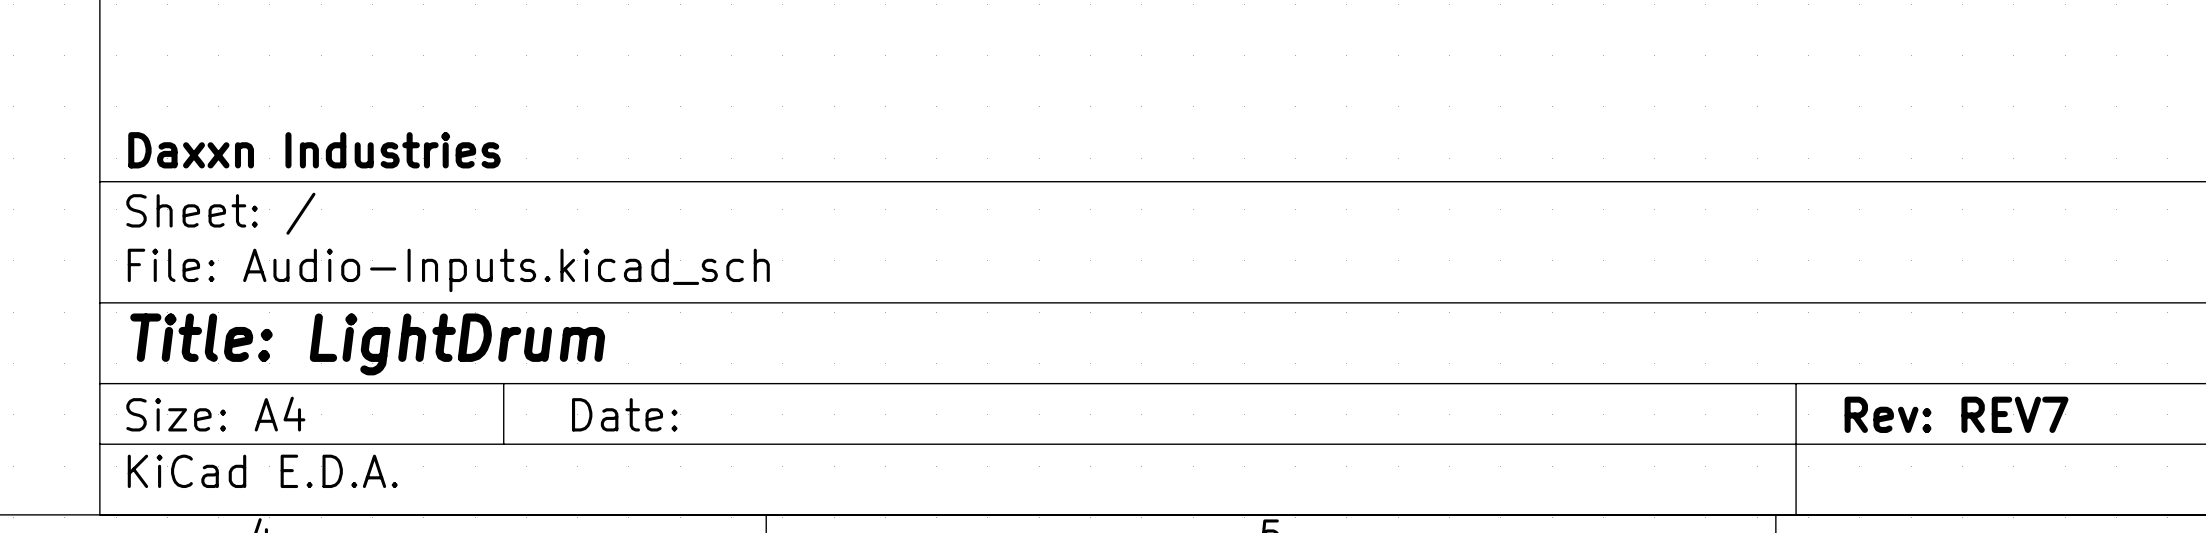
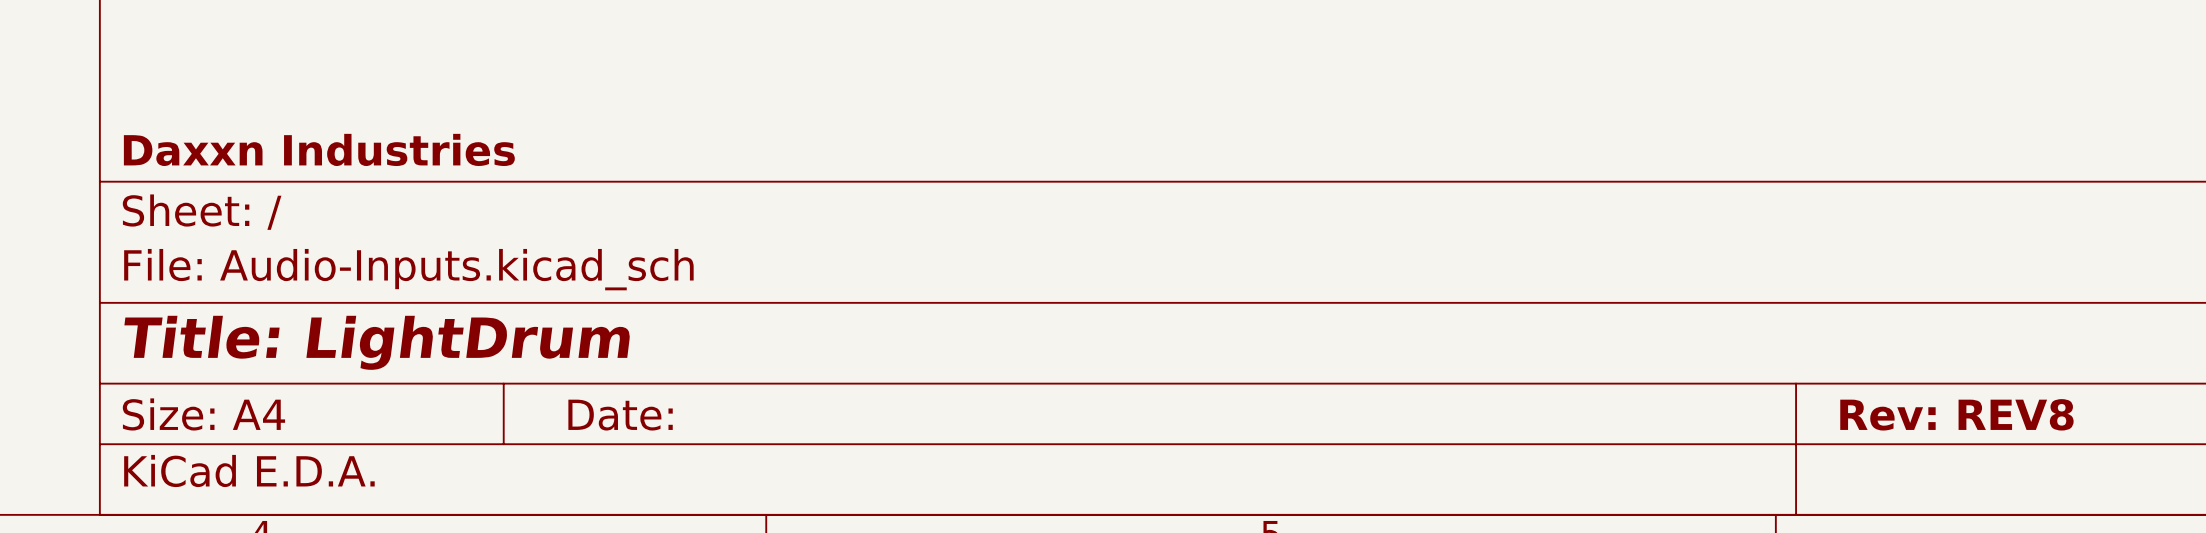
title block: Rev: REV7 (1956, 414) -> Rev: REV8 (1956, 414)

